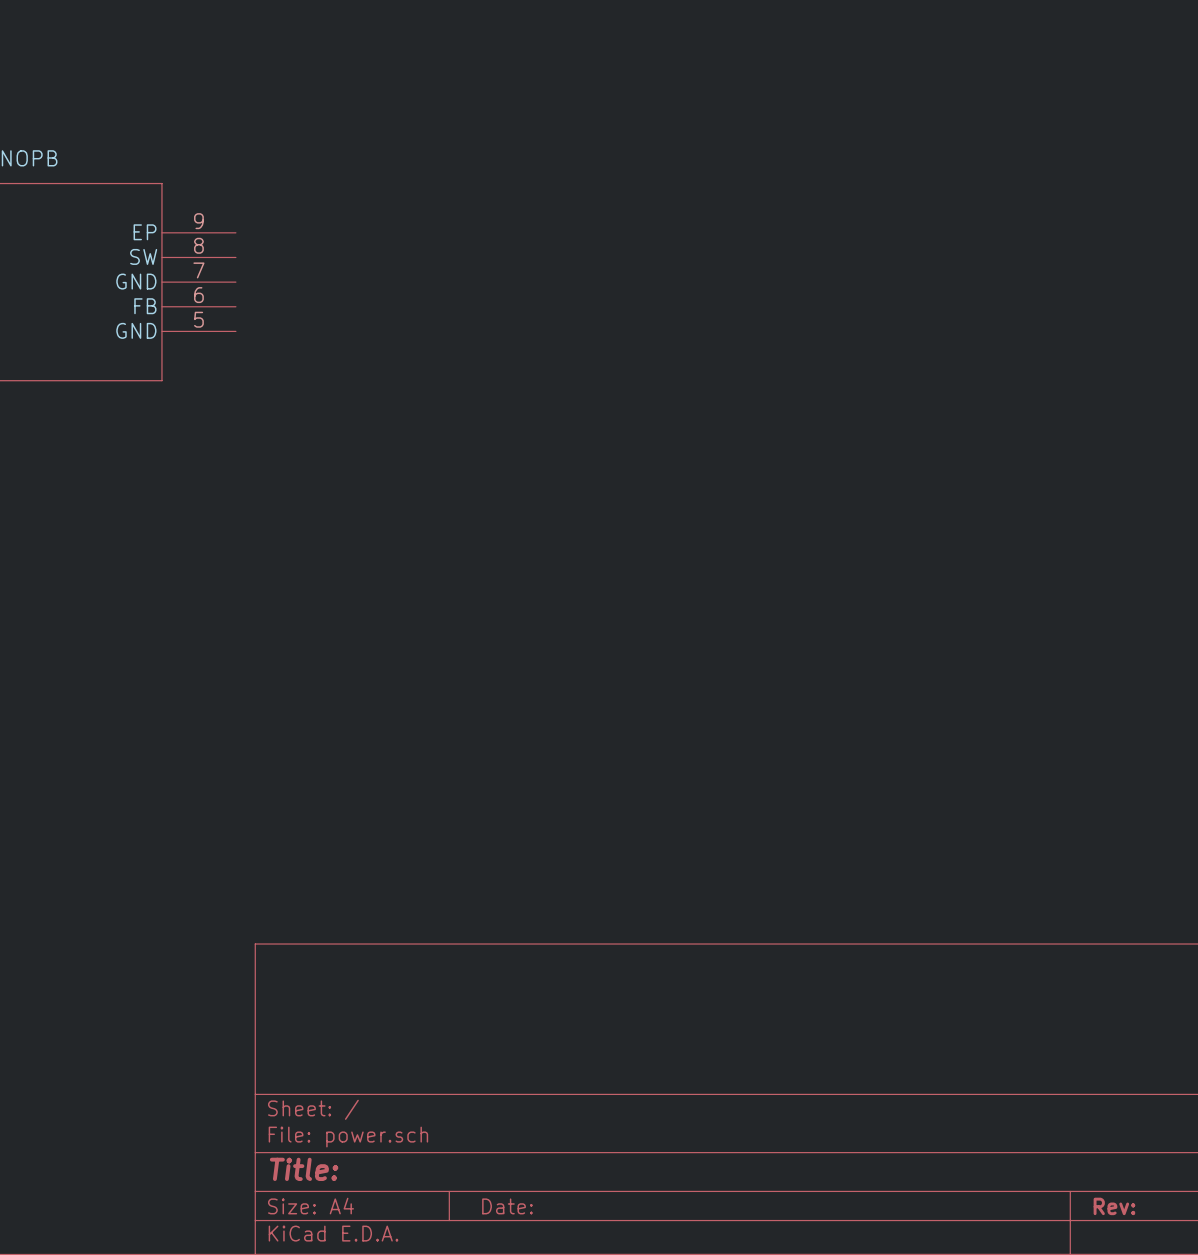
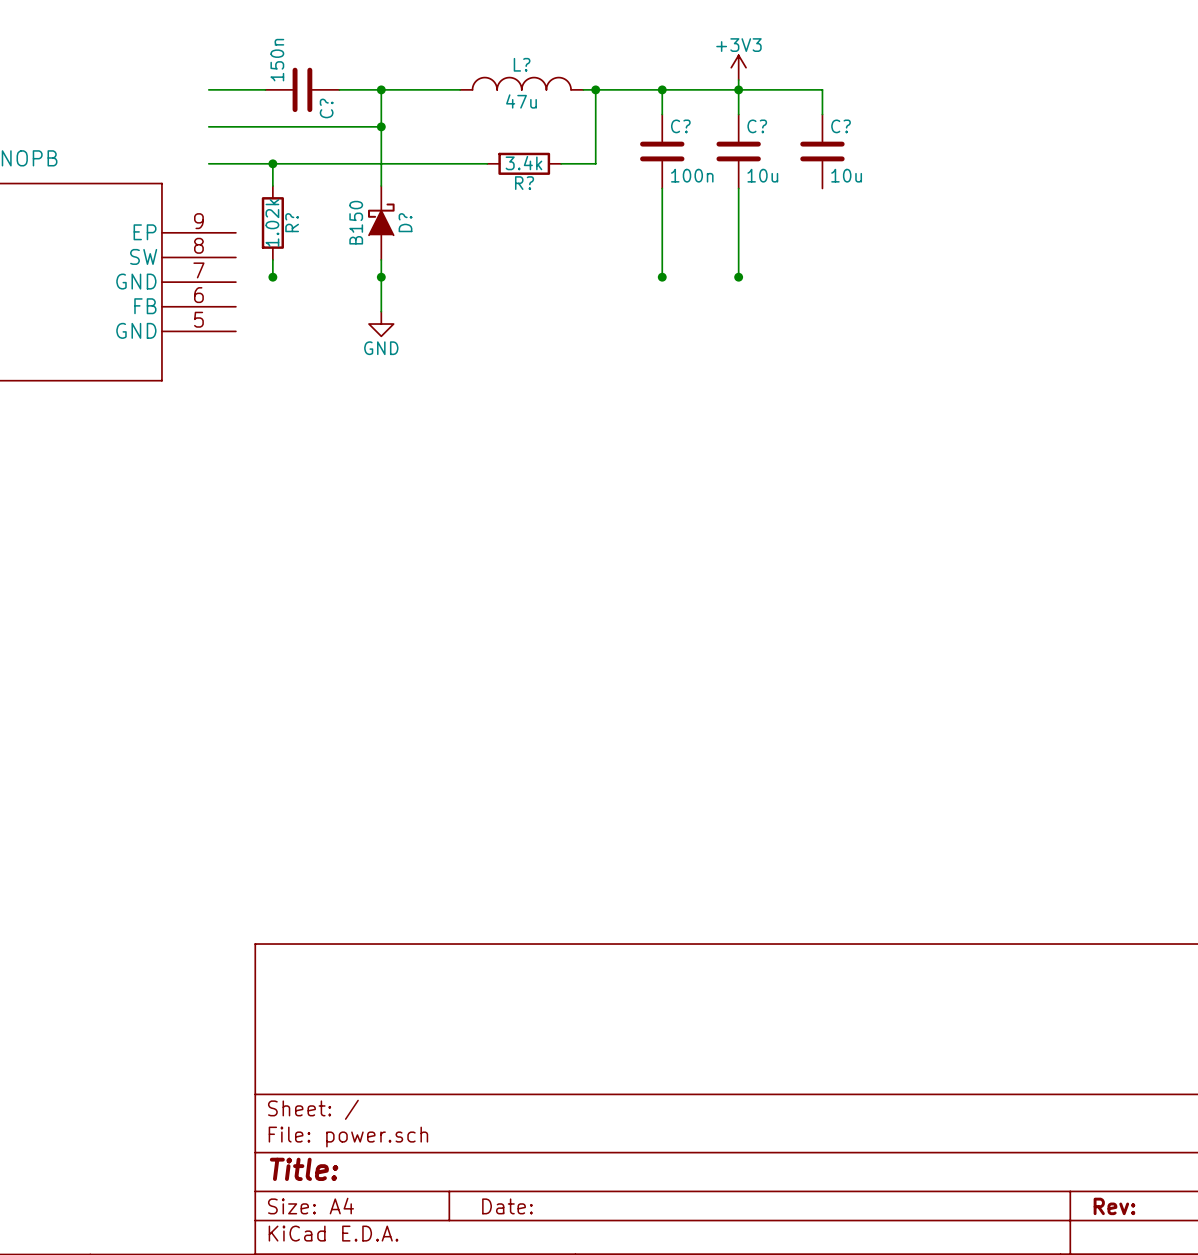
power symbol: none -> +3V3 (738, 67)
wire: none -> (738, 80) (738, 114)
L?: none -> 47u (521, 83)
wire: none -> (208, 89) (265, 89)
C?: none -> 150n (302, 89)
wire: none -> (339, 89) (460, 89)
wire: none -> (381, 89) (381, 186)
junction: none -> (381, 89)
wire: none -> (583, 89) (822, 89) (822, 114)
wire: none -> (595, 89) (595, 163) (561, 163)
junction: none -> (595, 89)
wire: none -> (662, 89) (662, 114)
junction: none -> (662, 89)
junction: none -> (738, 89)
wire: none -> (208, 126) (381, 126)
junction: none -> (381, 126)
C?: none -> 100n (662, 151)
C?: none -> 10u (738, 151)
C?: none -> 10u (822, 151)
wire: none -> (208, 163) (487, 163)
wire: none -> (272, 163) (272, 186)
junction: none -> (272, 163)
R?: none -> 3.4k (524, 163)
wire: none -> (662, 188) (662, 277)
wire: none -> (738, 188) (738, 277)
R?: none -> 1.02k (272, 222)
D?: none -> B150 (381, 222)
wire: none -> (272, 259) (272, 277)
wire: none -> (381, 259) (381, 311)
junction: none -> (272, 277)
junction: none -> (381, 277)
junction: none -> (662, 277)
junction: none -> (738, 277)
power symbol: none -> GND (381, 324)

